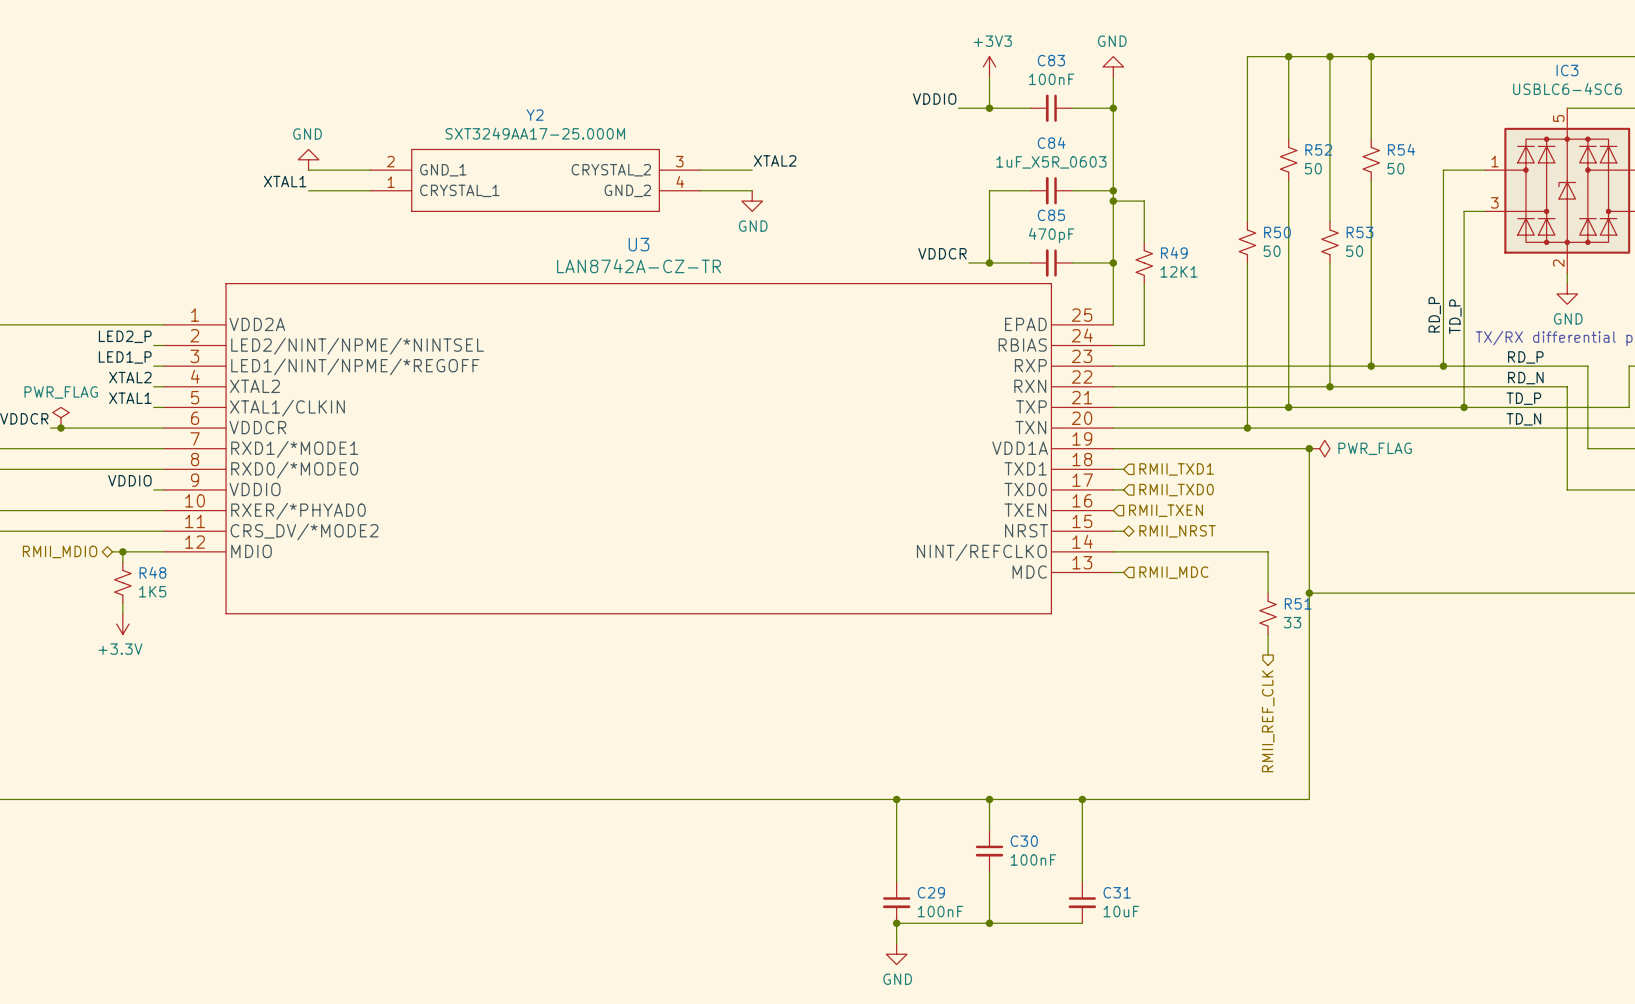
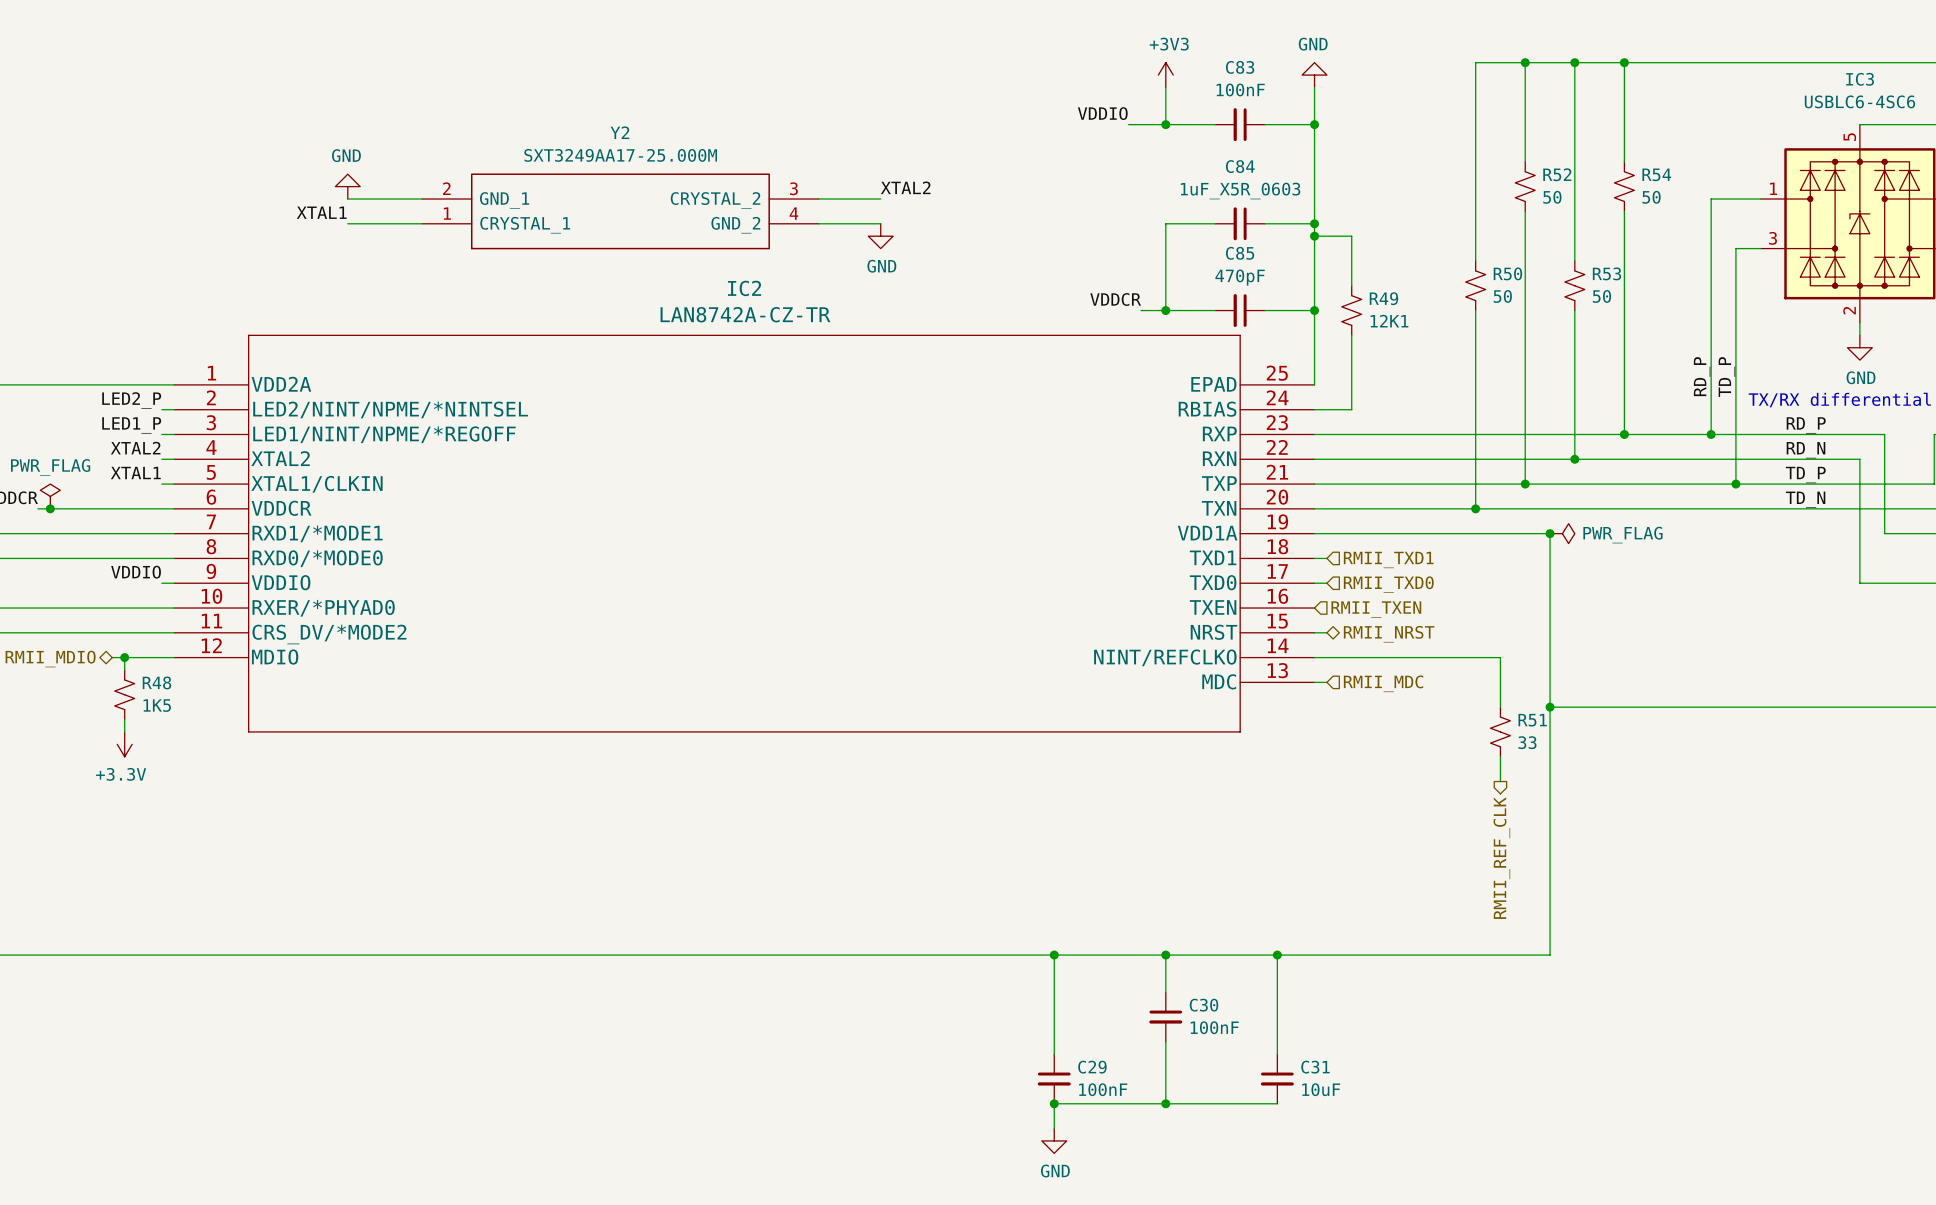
U3 name: U3 (639, 244) -> IC2 (744, 288)

